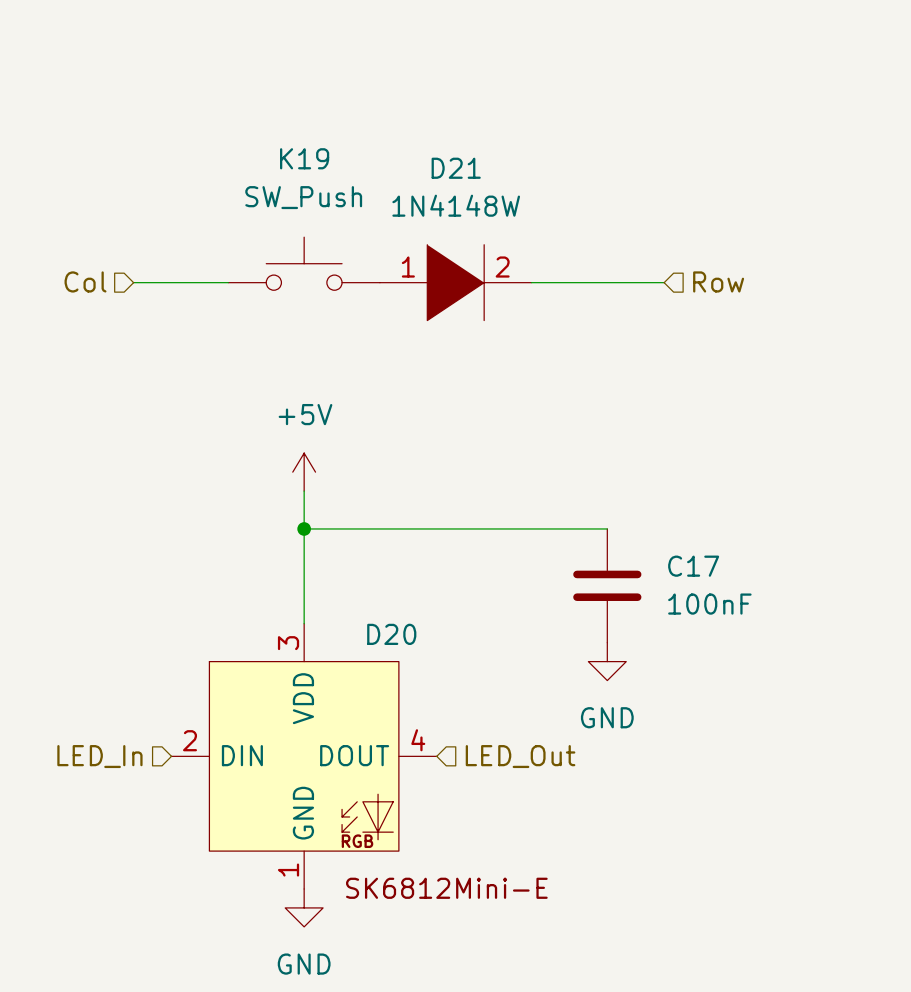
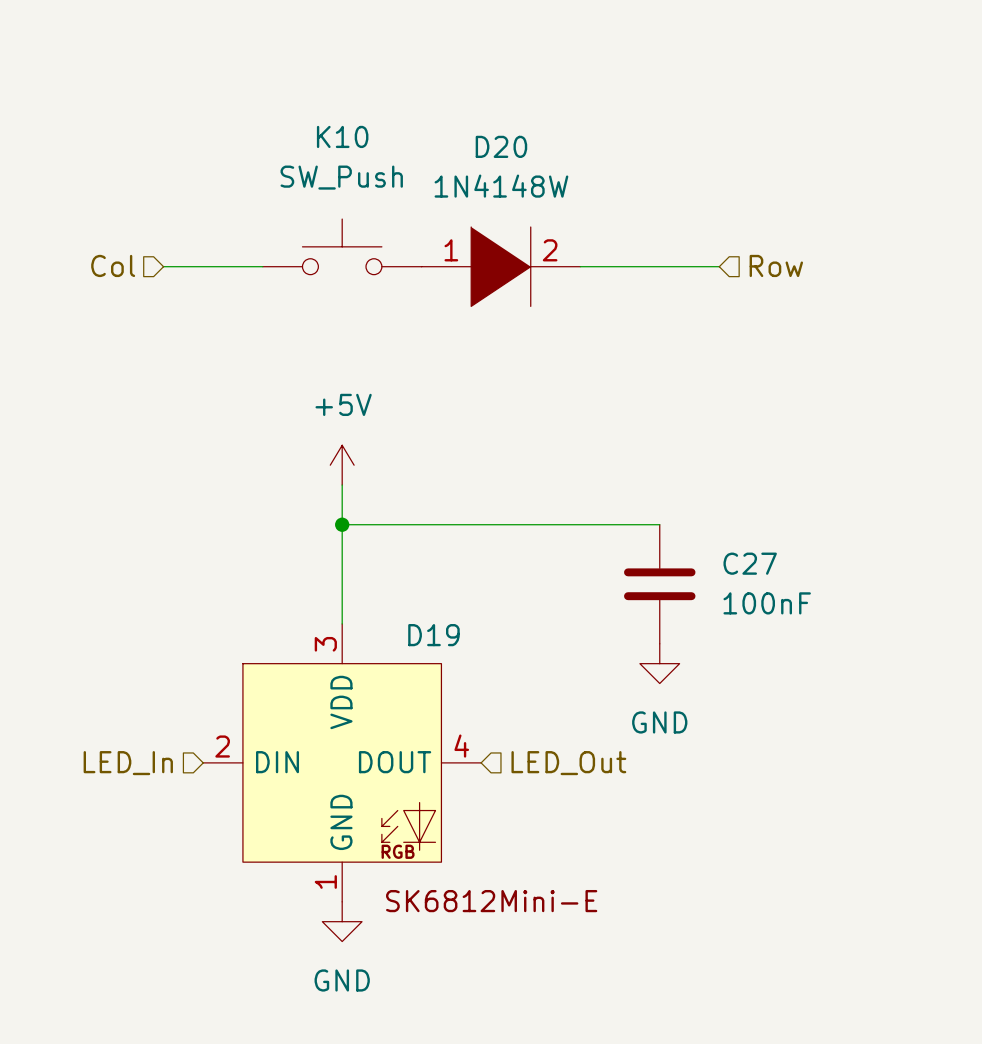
K19 name: K19 (304, 158) -> K10 (342, 136)
D21 name: D21 (456, 168) -> D20 (501, 146)
C17 name: C17 (693, 566) -> C27 (750, 563)
D20 name: D20 (391, 634) -> D19 (433, 635)

